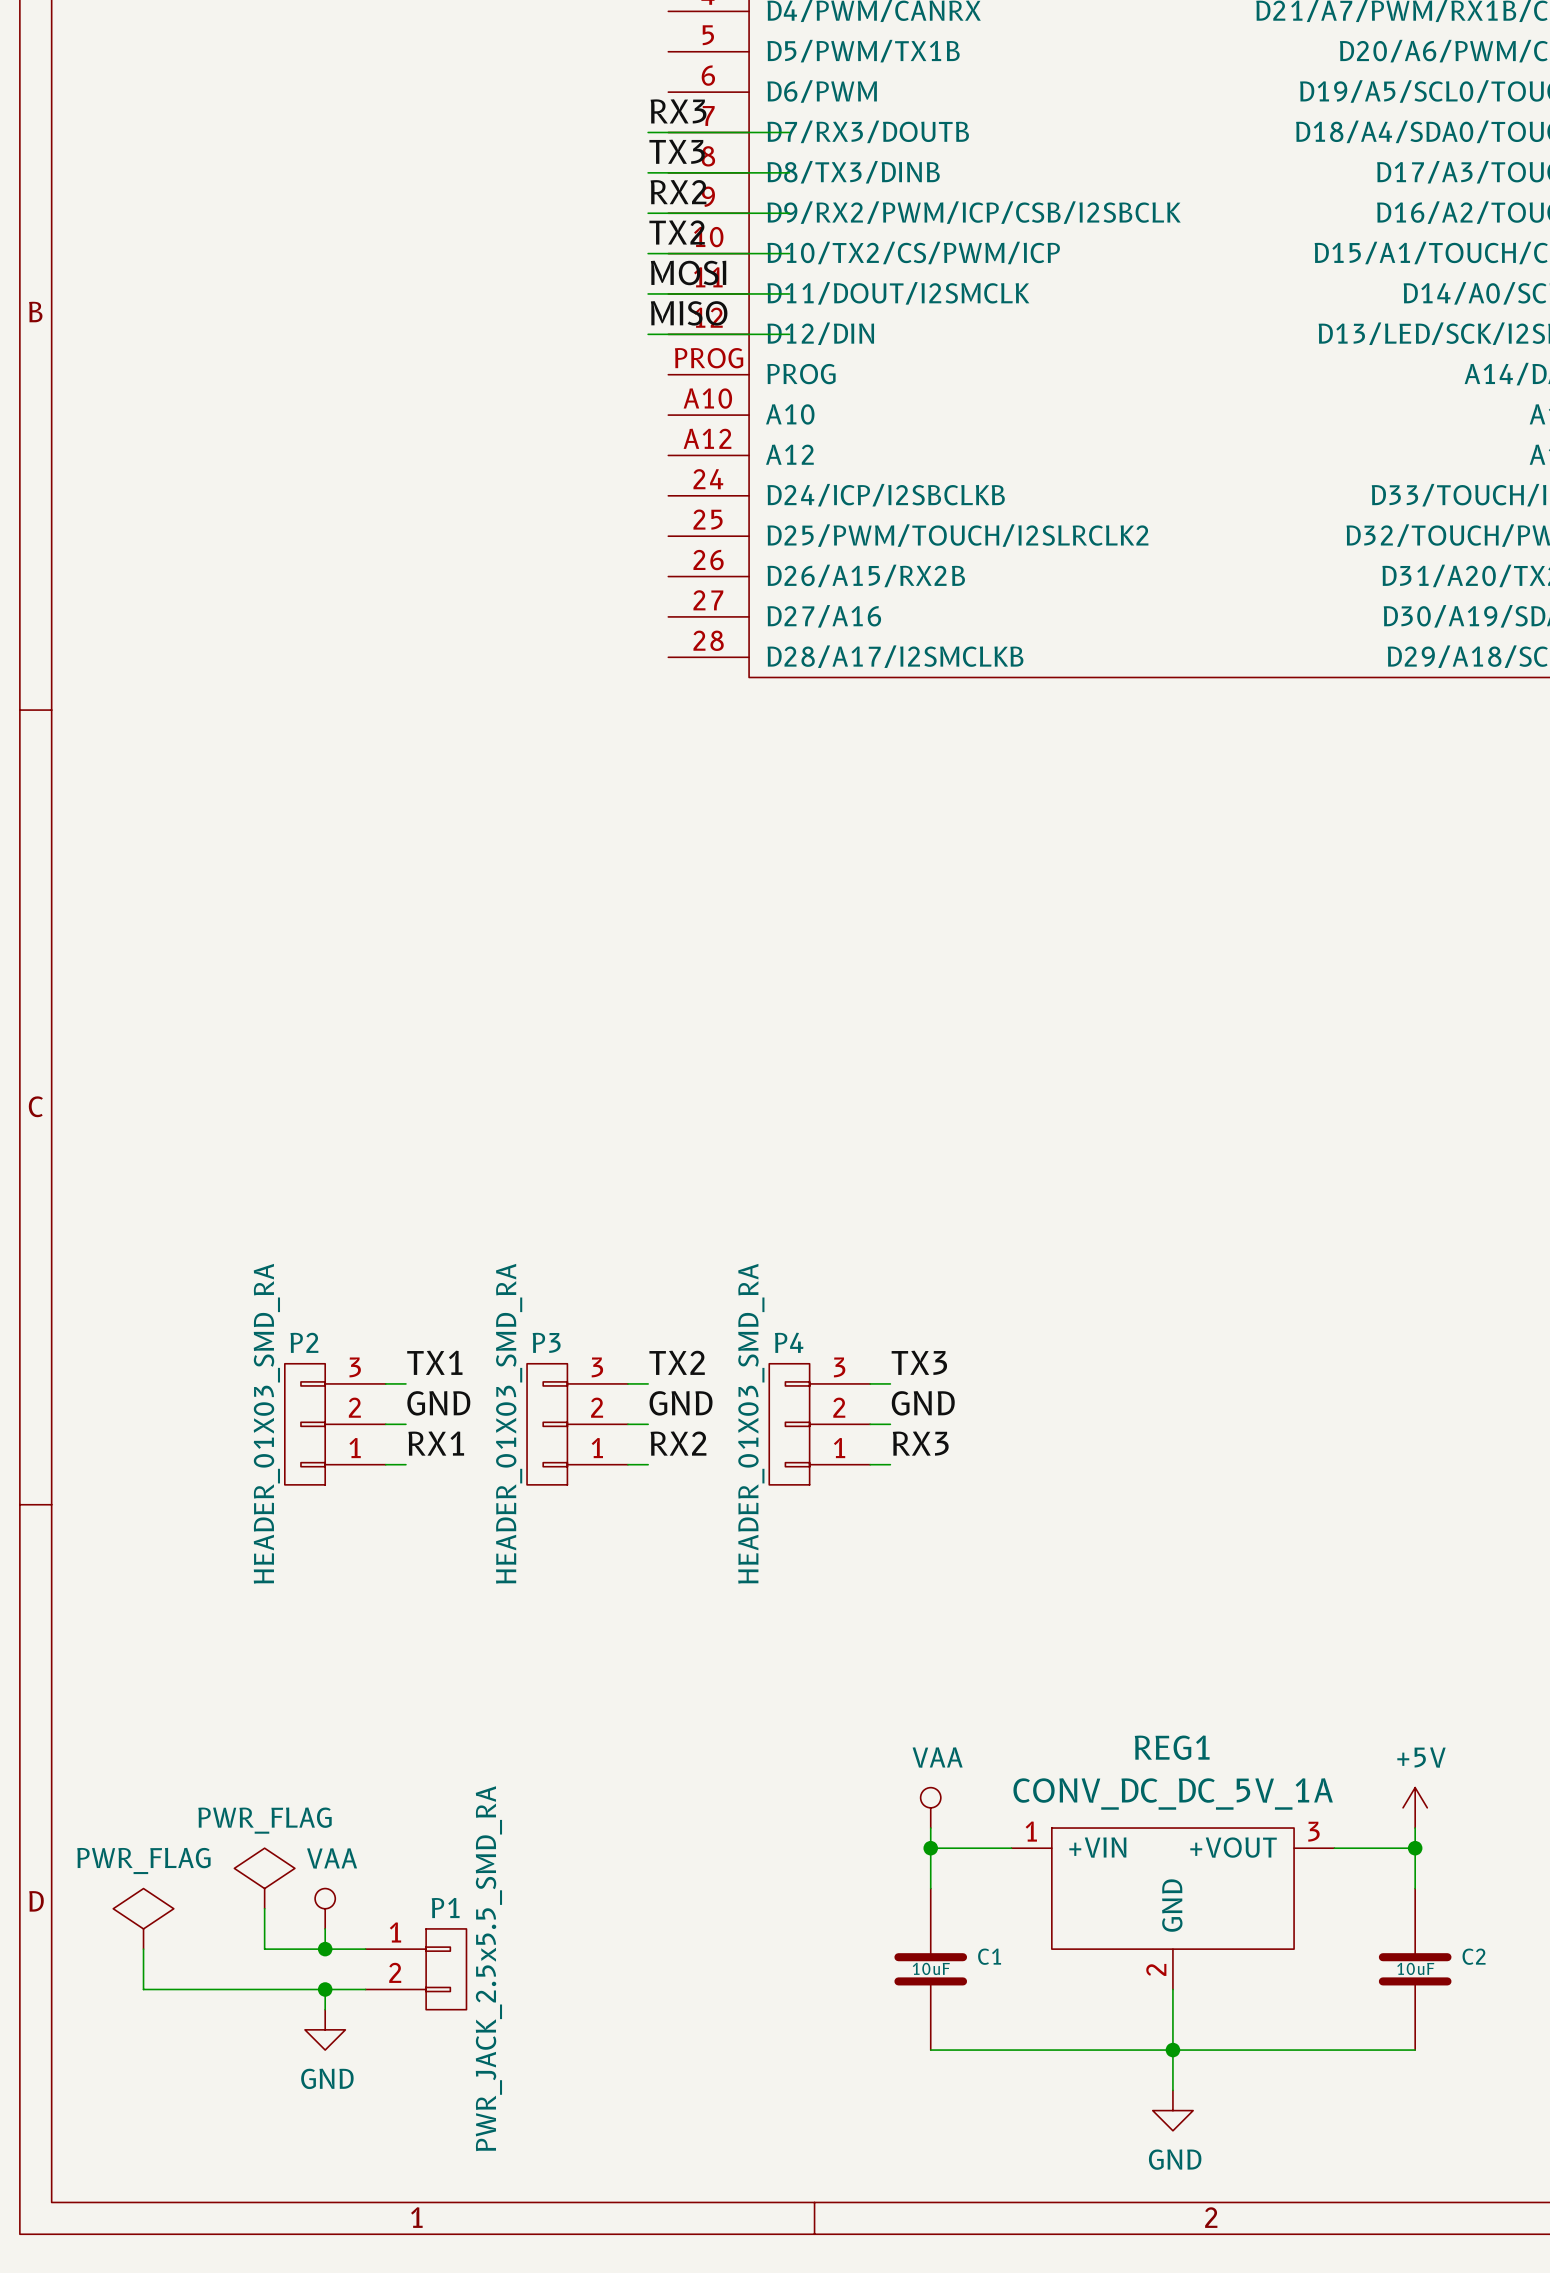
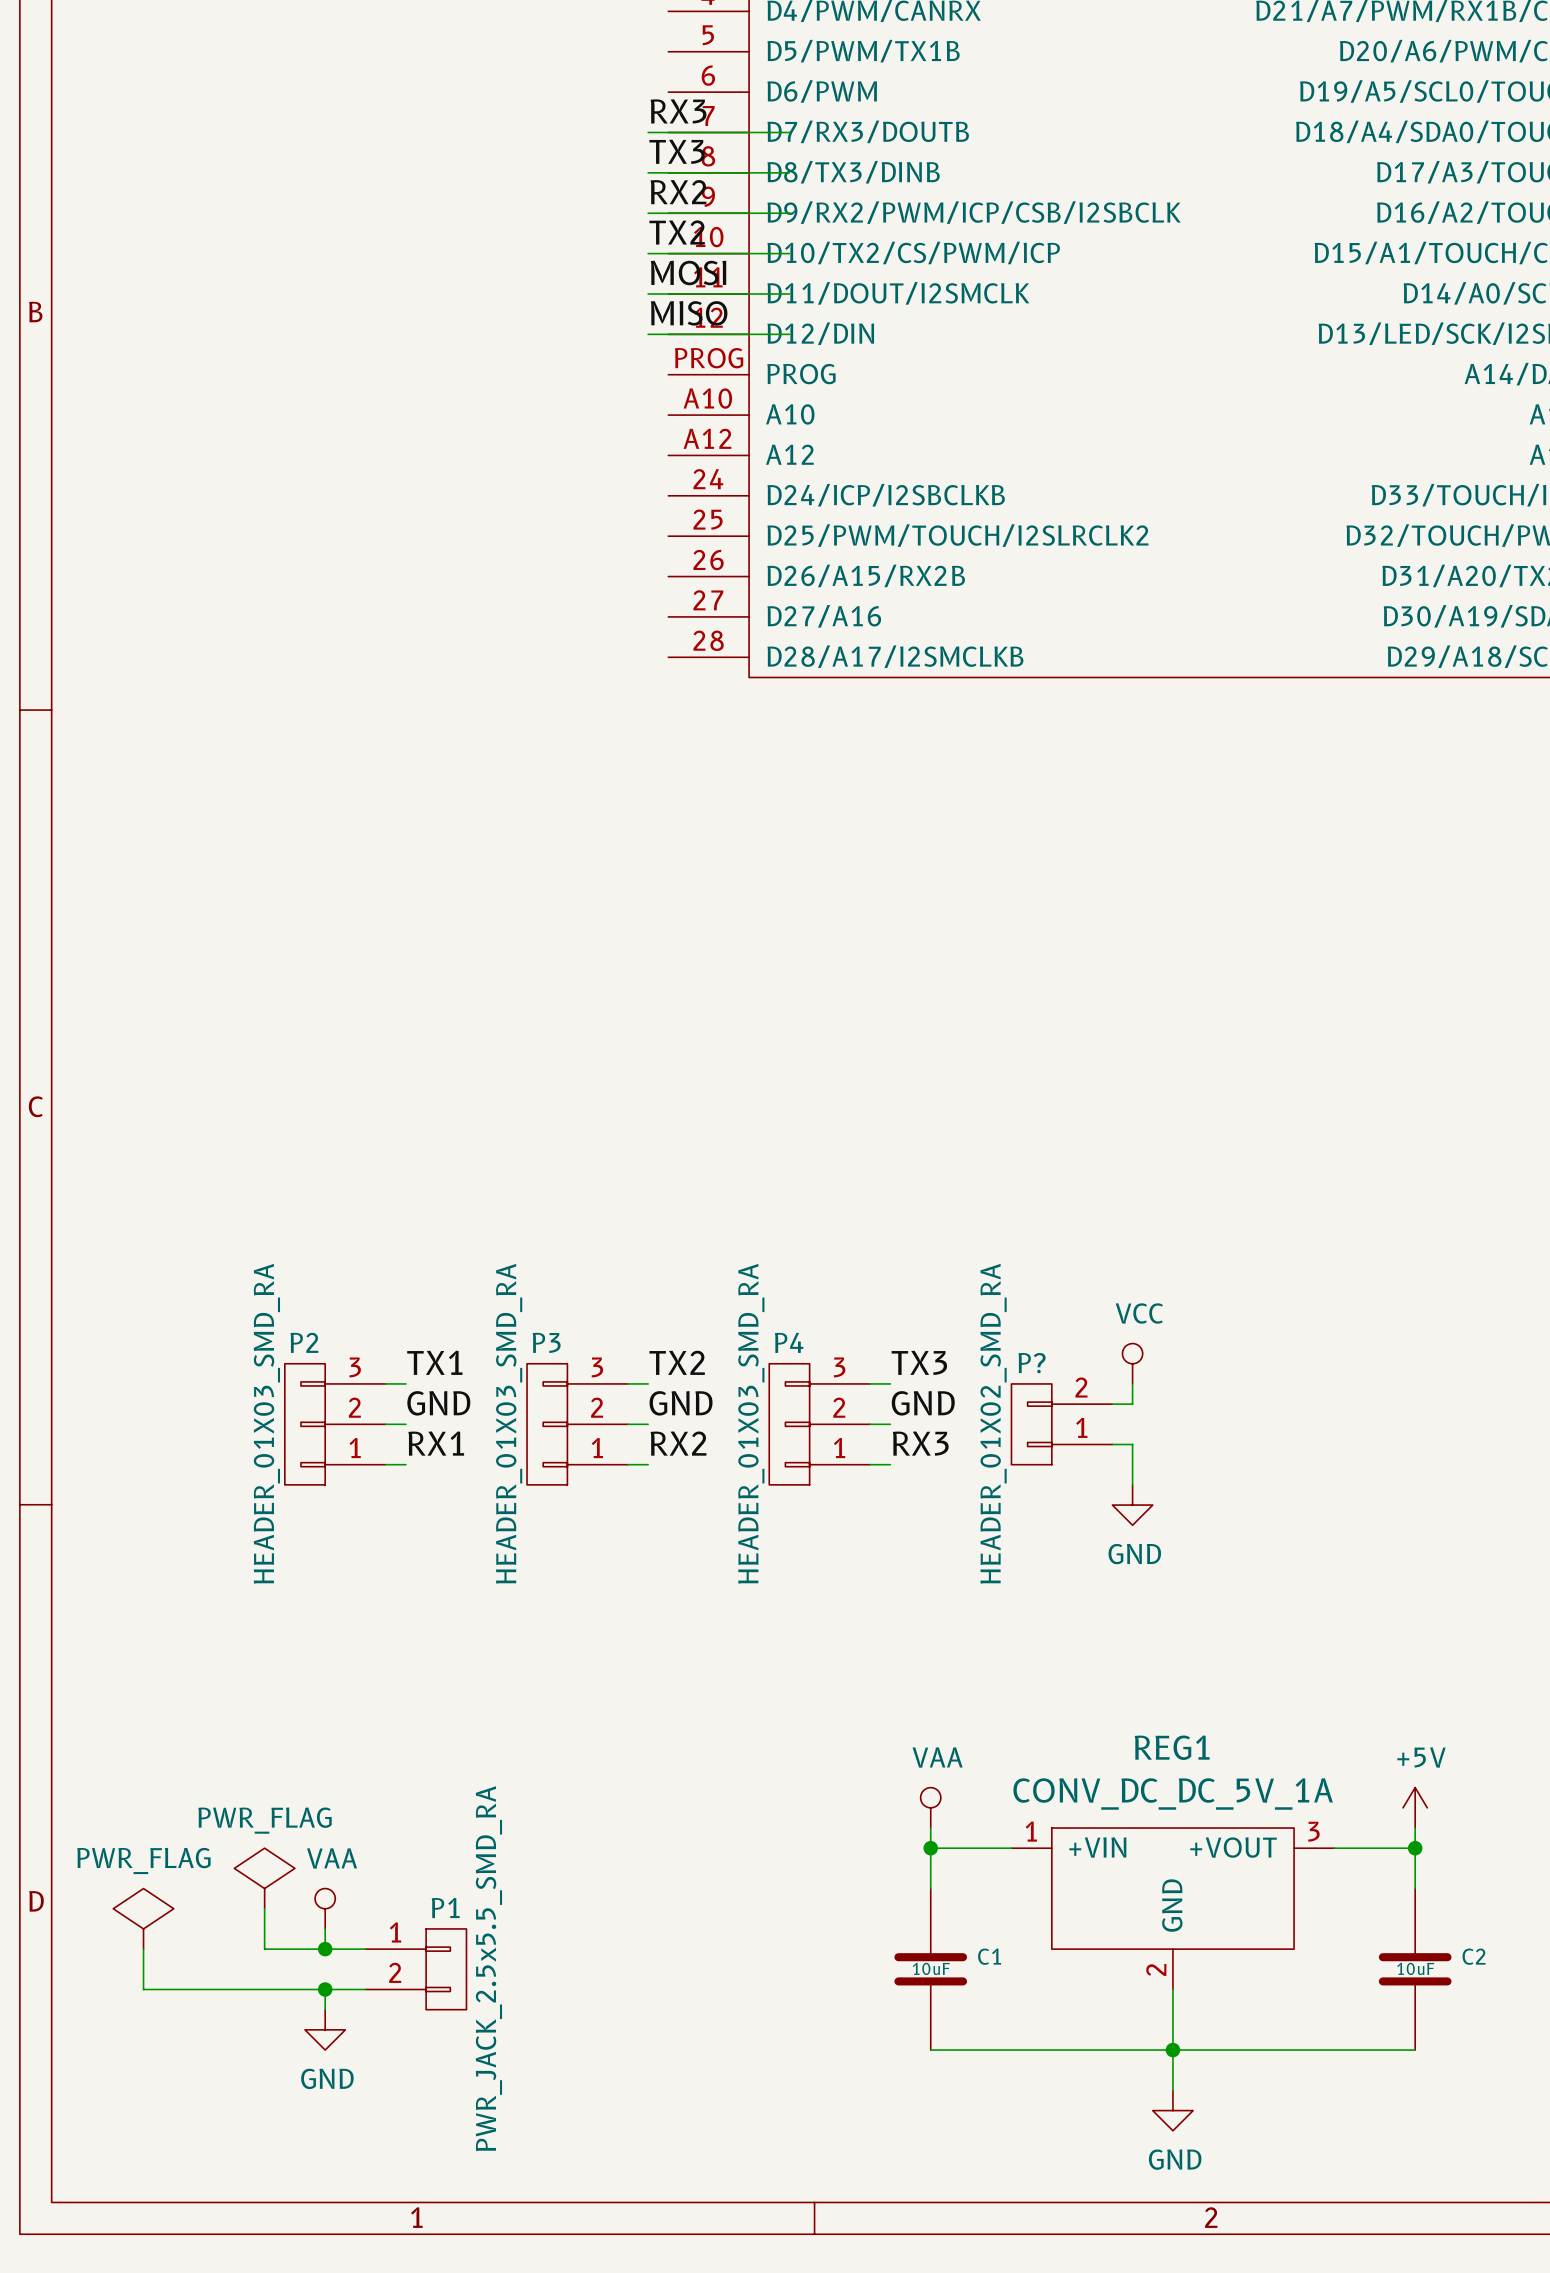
power symbol: none -> VCC (1132, 1363)
wire: none -> (1132, 1383) (1132, 1404) (1112, 1404)
P?: none -> HEADER_01X02_SMD_RA (1061, 1424)
wire: none -> (1112, 1444) (1132, 1444) (1132, 1484)
power symbol: none -> GND (1132, 1505)

